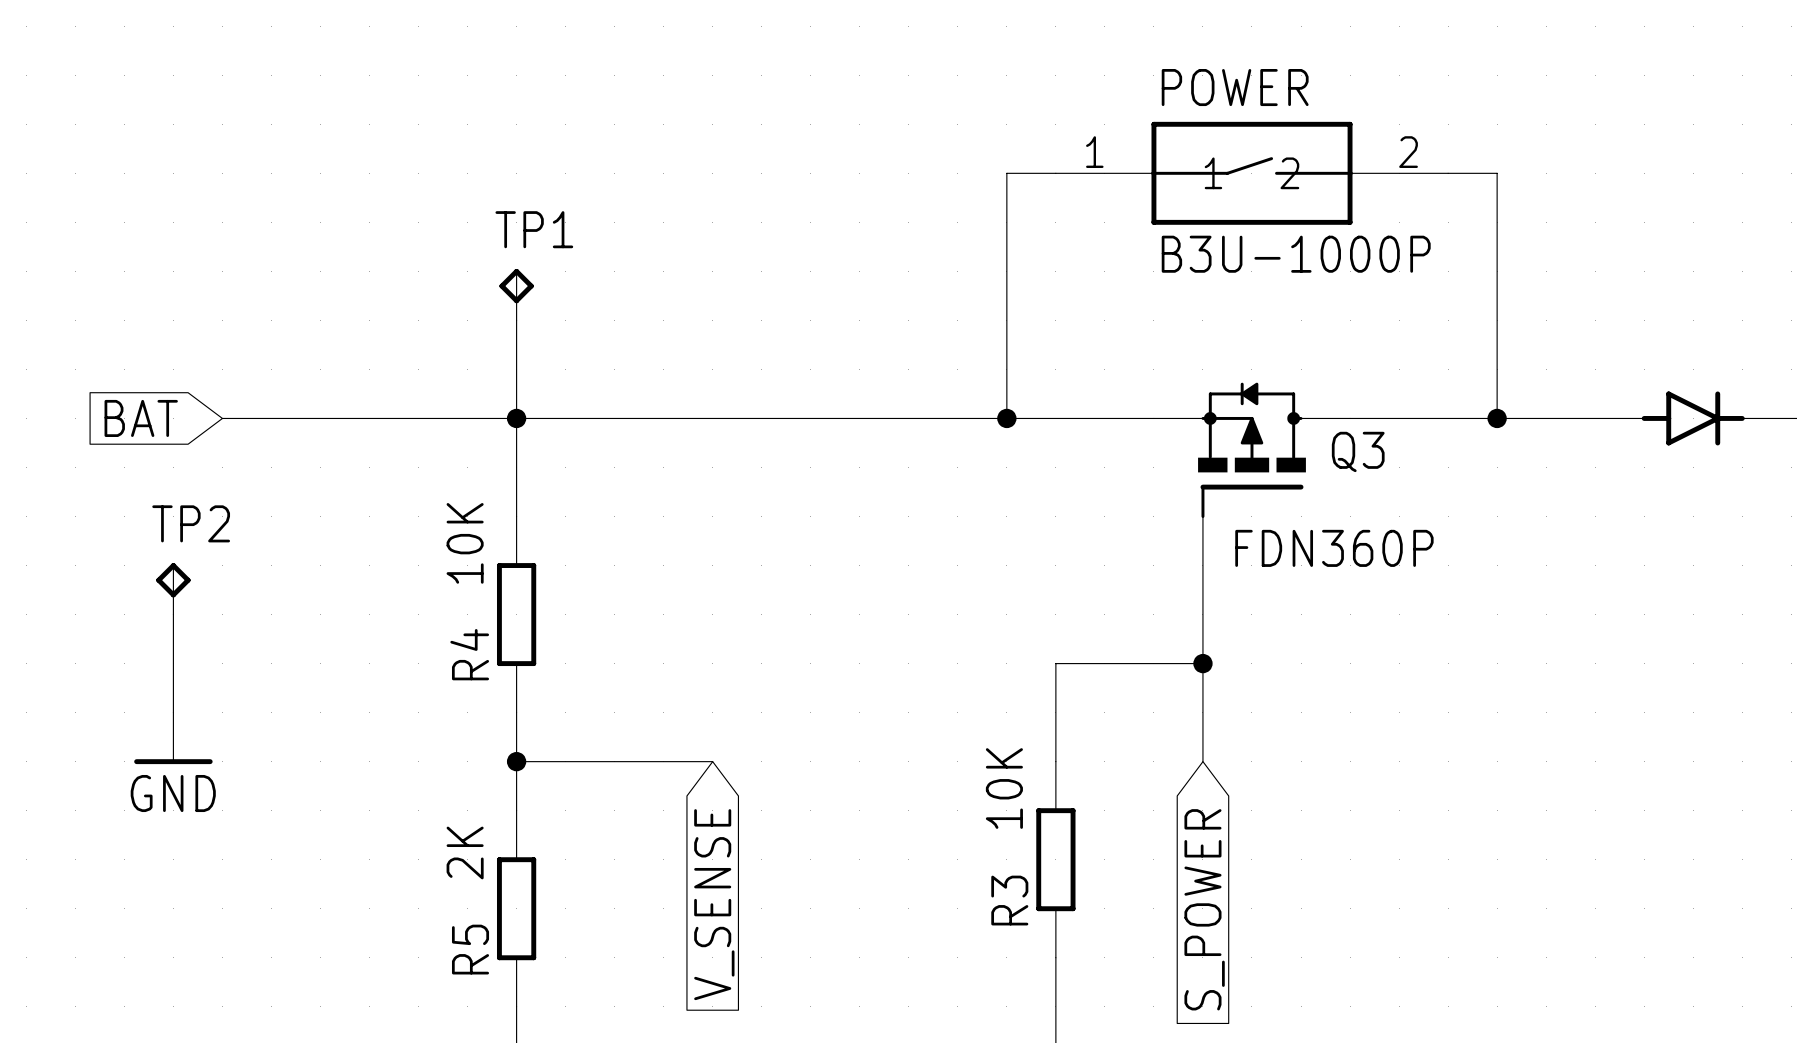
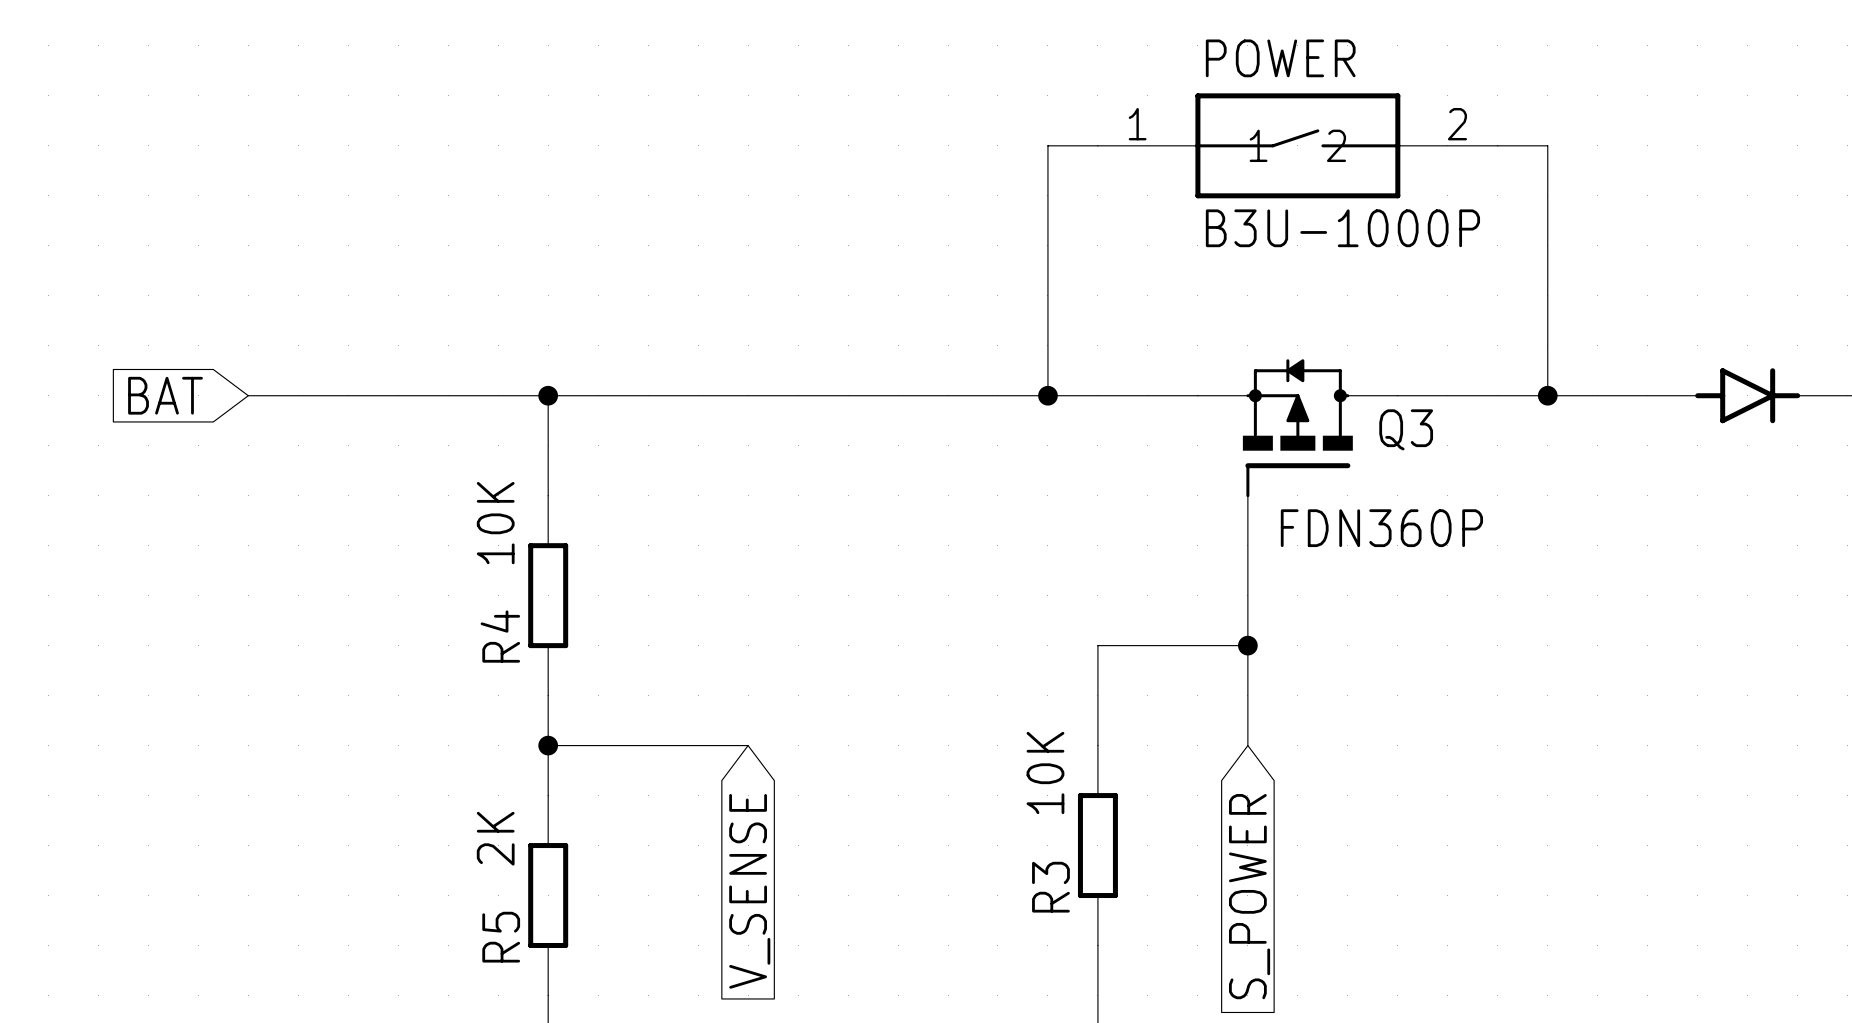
TP1: (516, 294) -> none
wire: (516, 320) (516, 418) -> none
TP2: (173, 588) -> none
wire: (173, 614) (173, 712) -> none
power symbol: GND (173, 738) -> none

